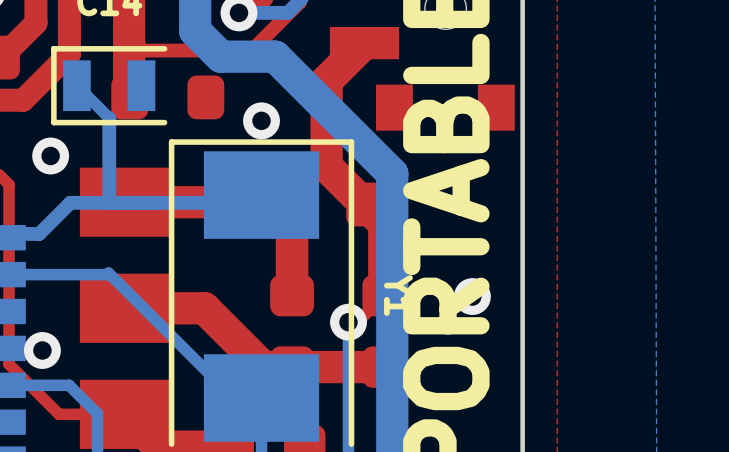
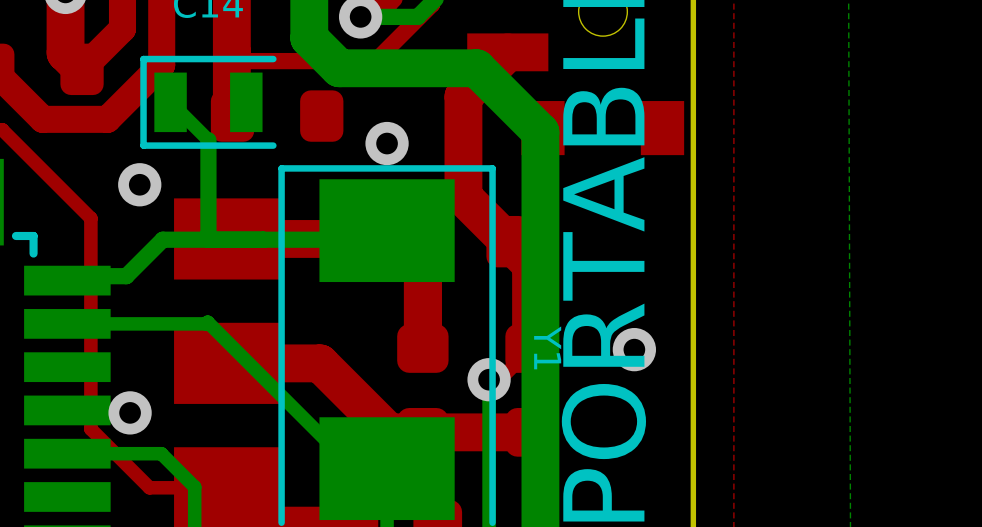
bottom track: (275, 56) (392, 173) -> (403, 68) (476, 68) (540, 132) (540, 205)

